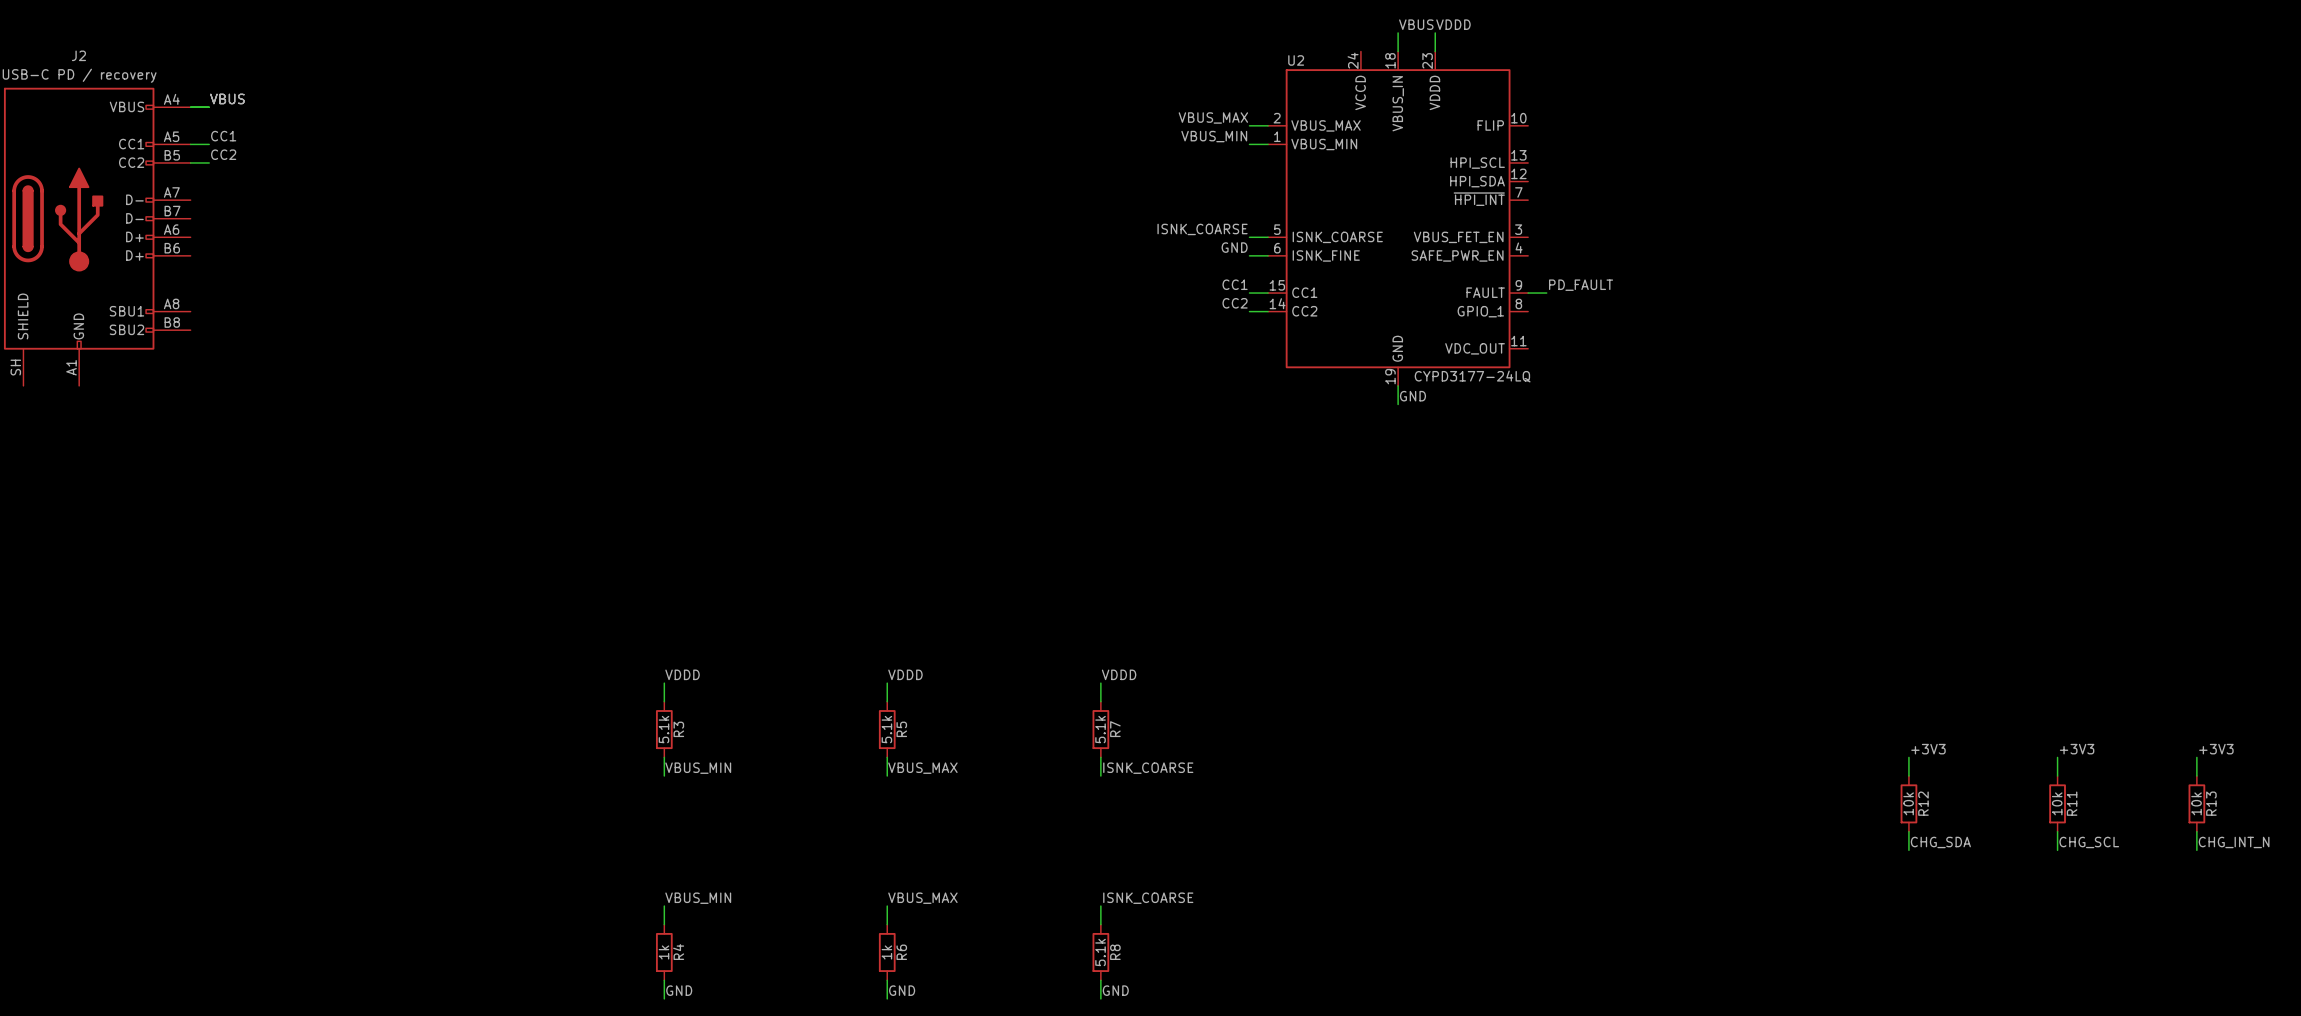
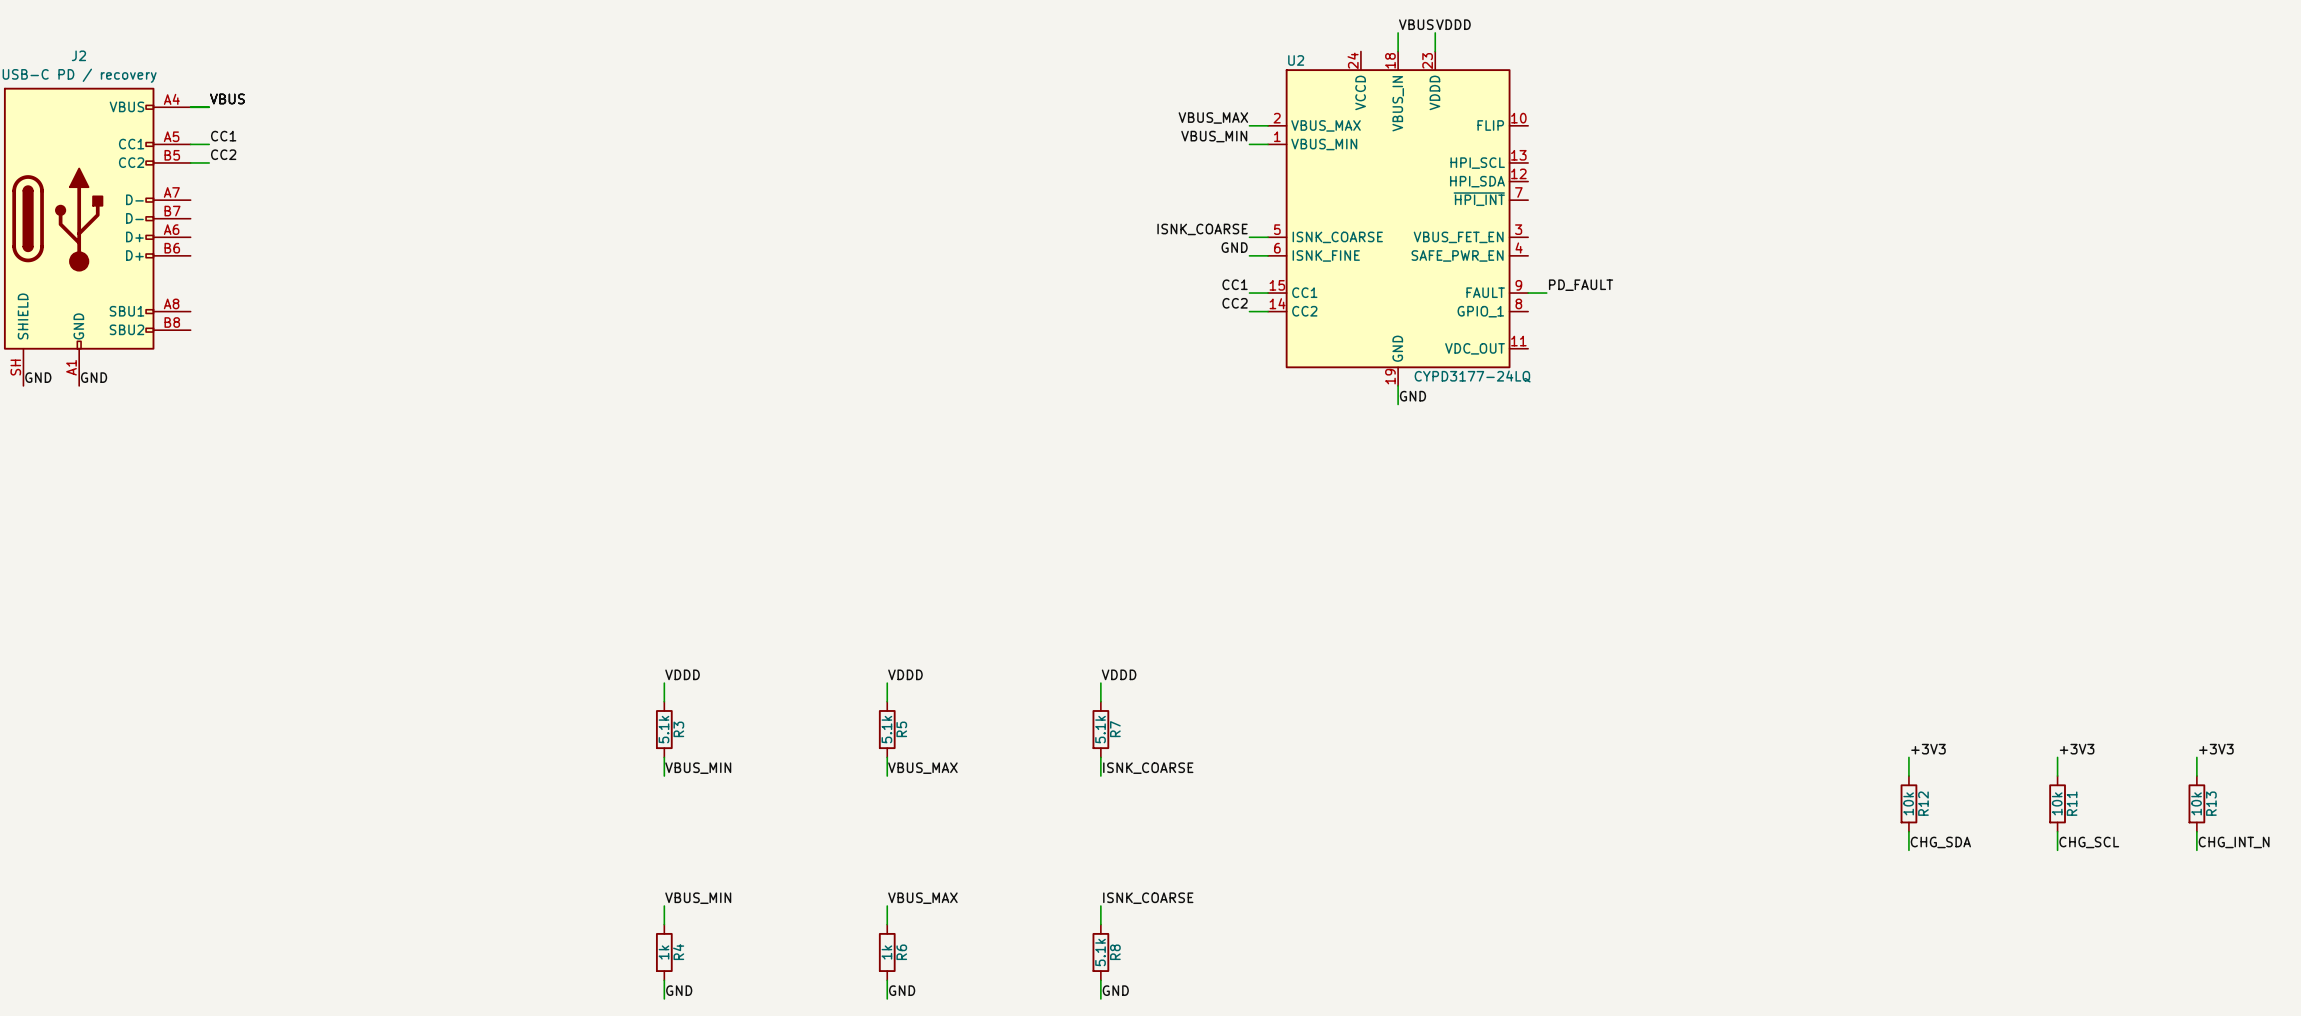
label: none -> GND (38, 377)
label: none -> GND (94, 377)

